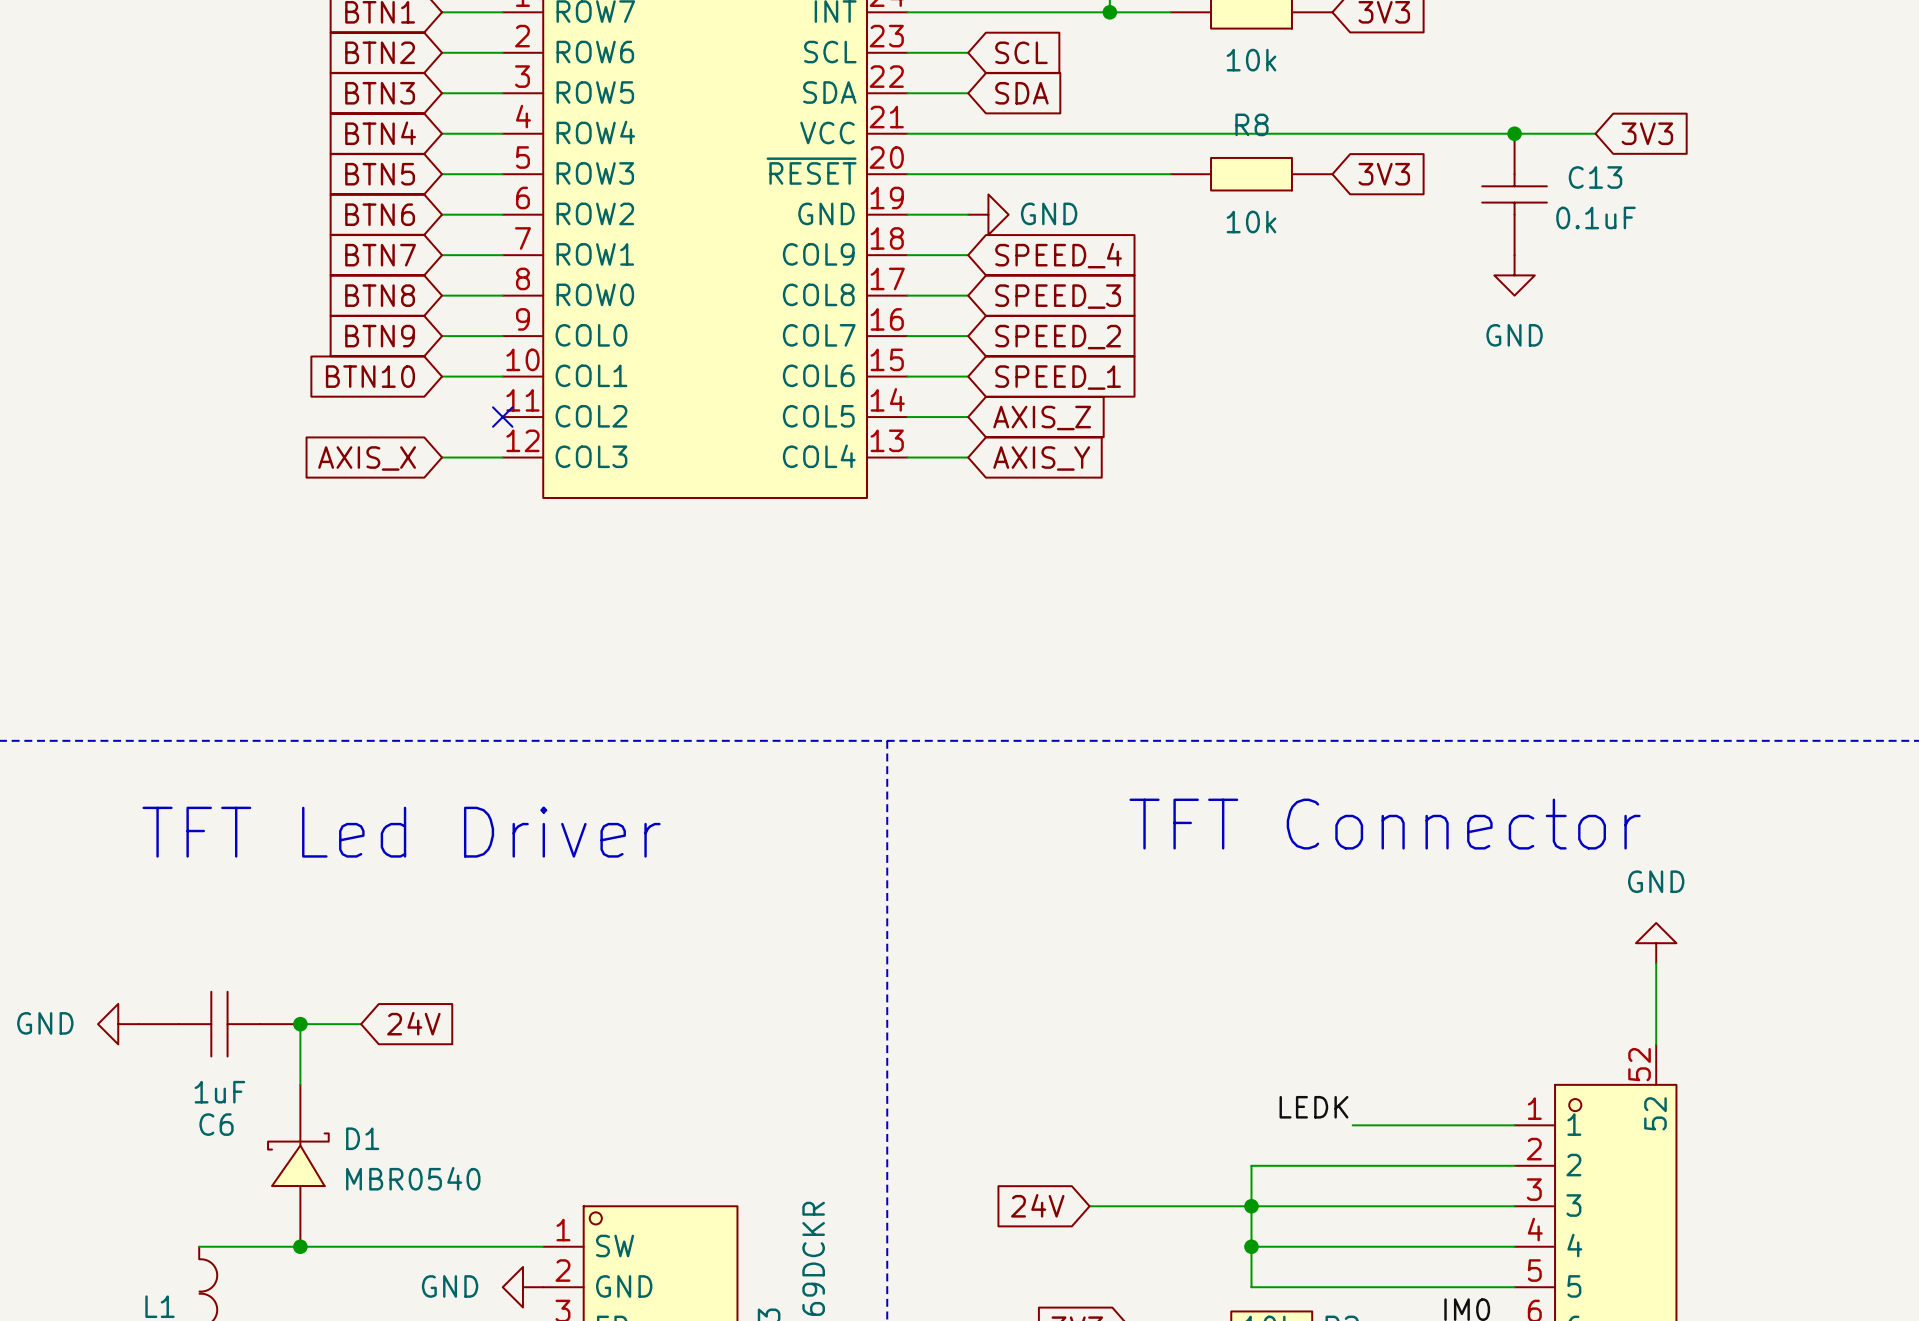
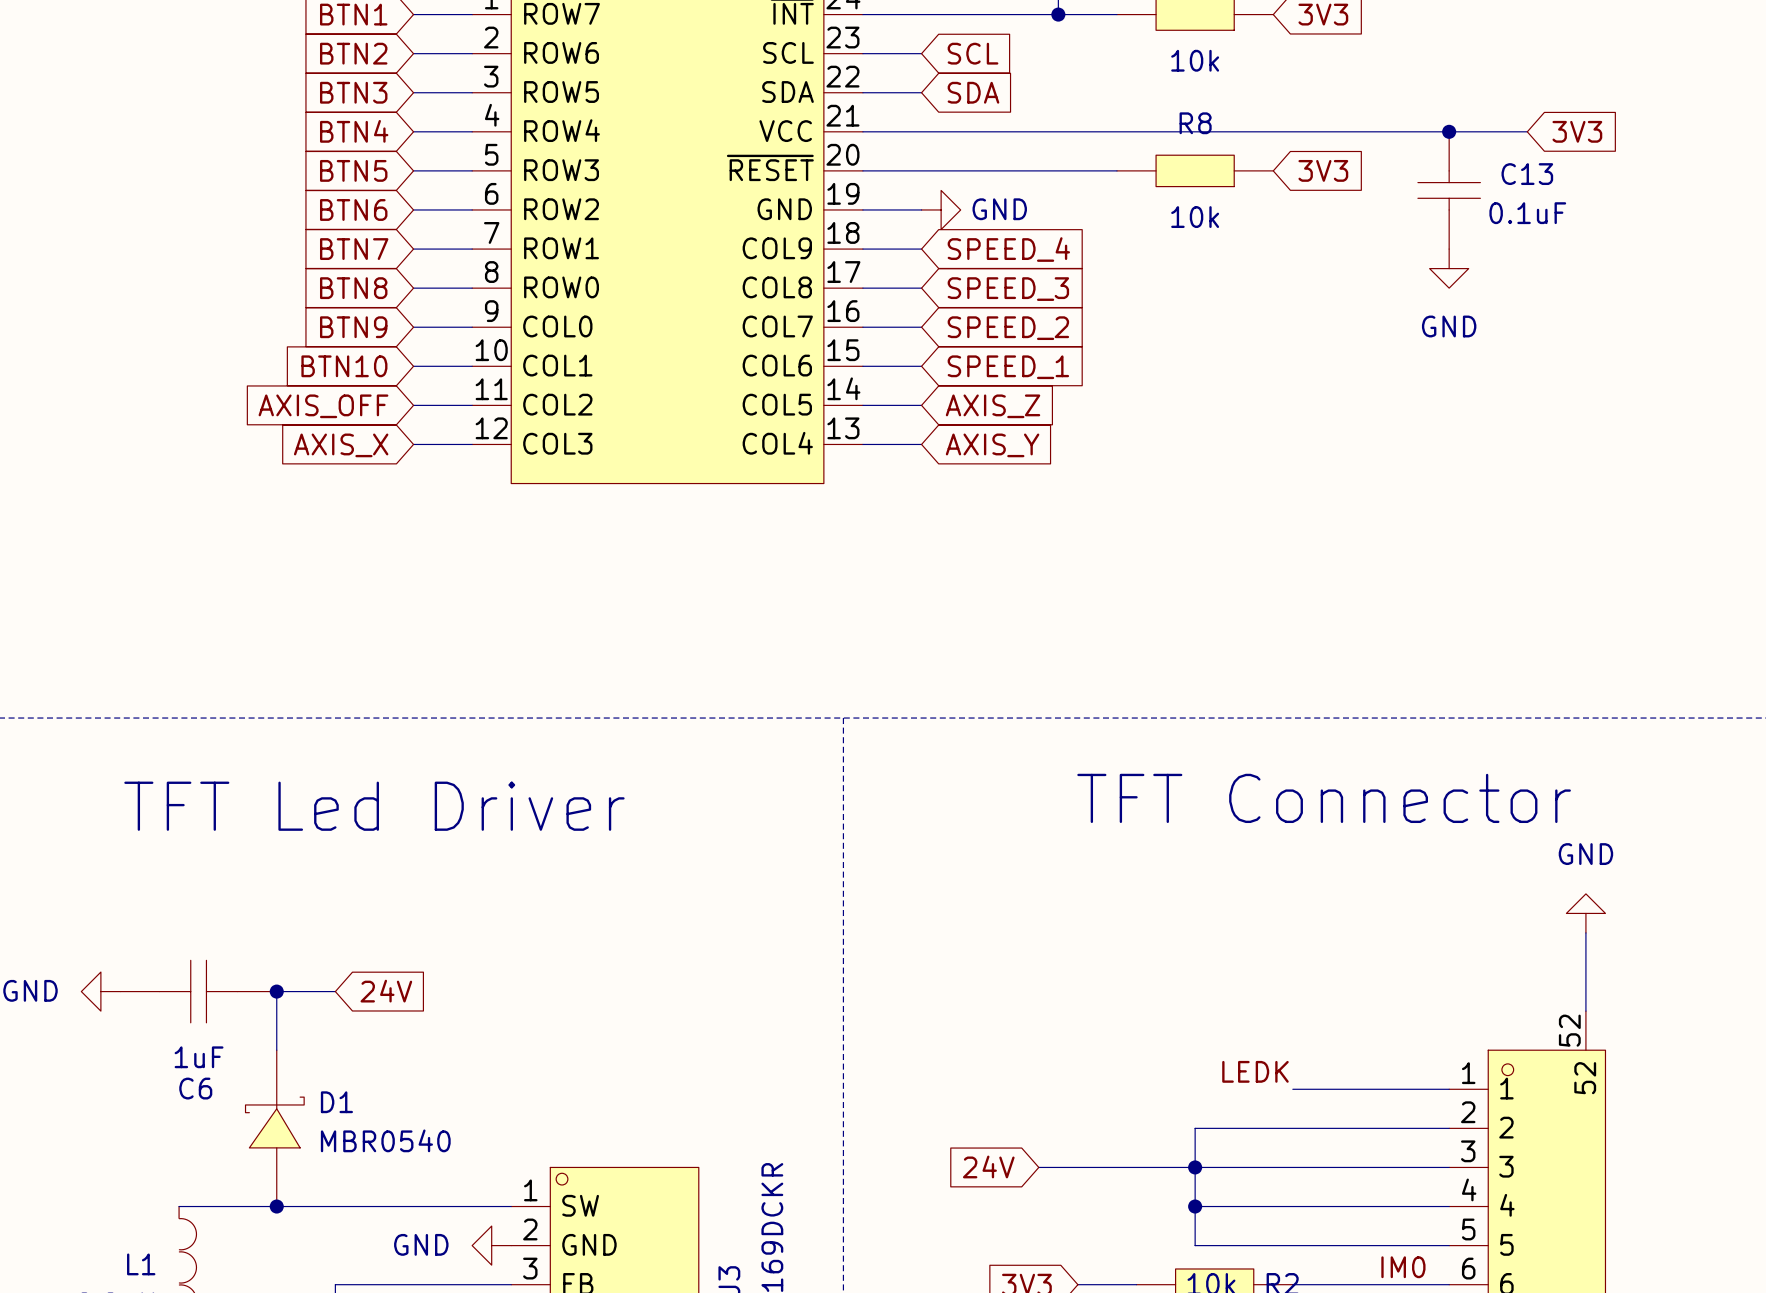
wire: none -> (413, 405) (472, 405)
no-connect mark: (502, 417) -> none
global label: none -> AXIS_OFF (323, 406)

